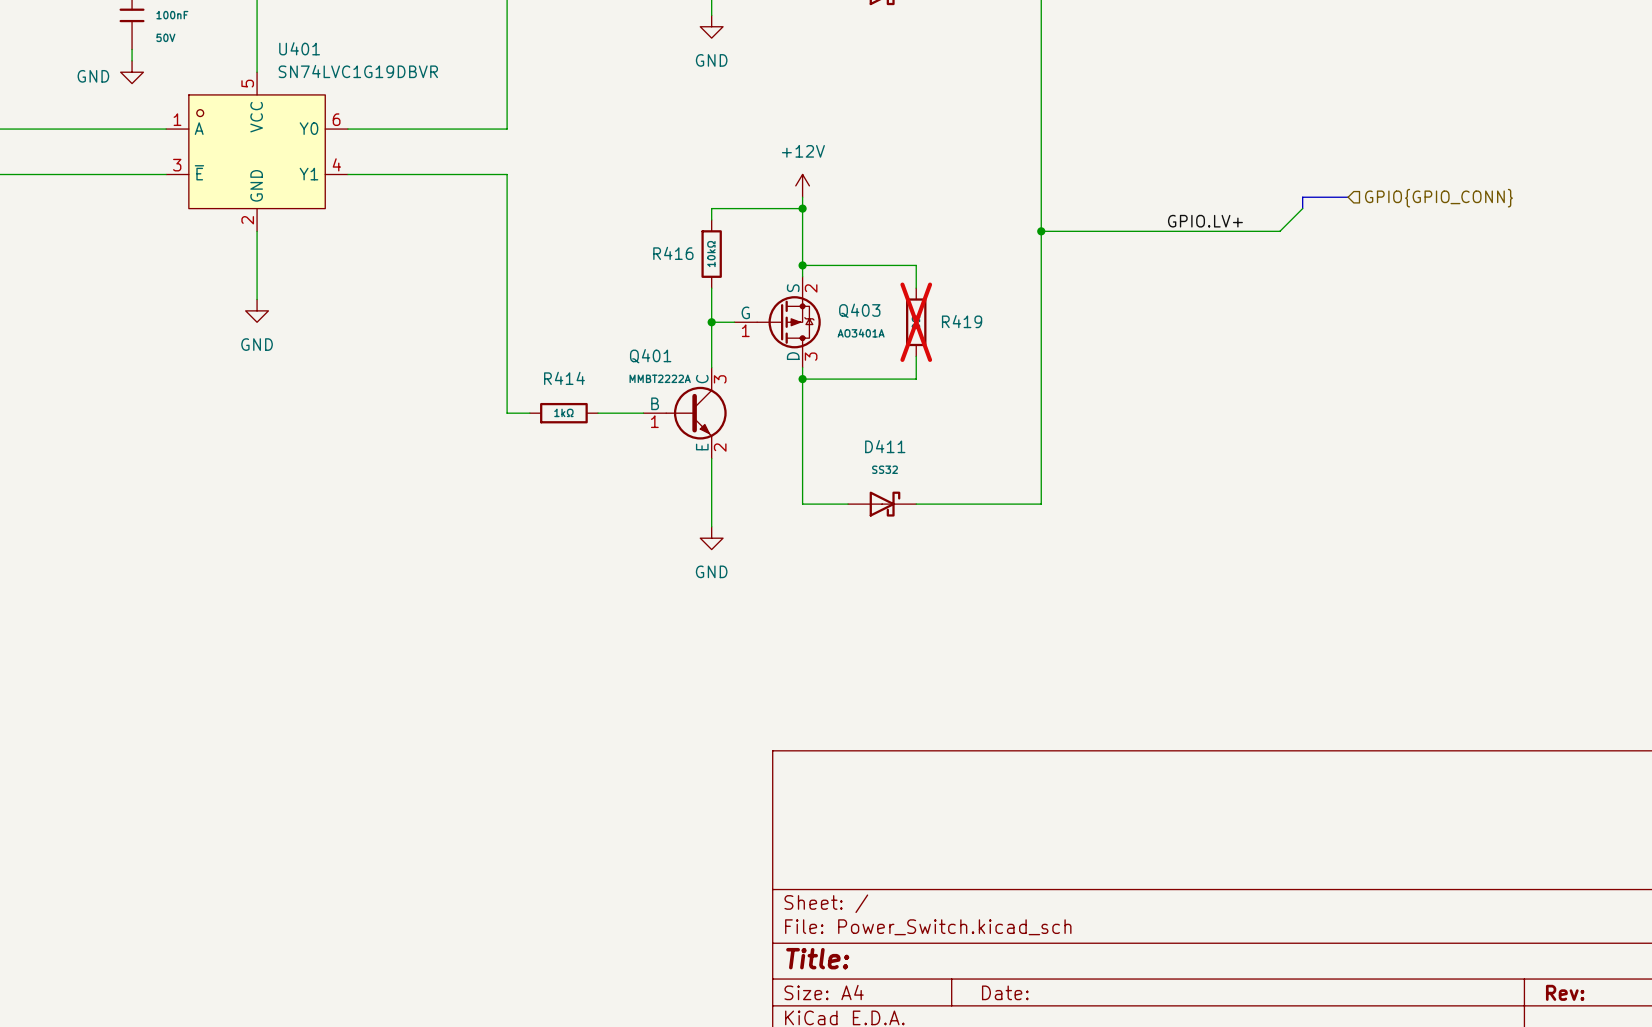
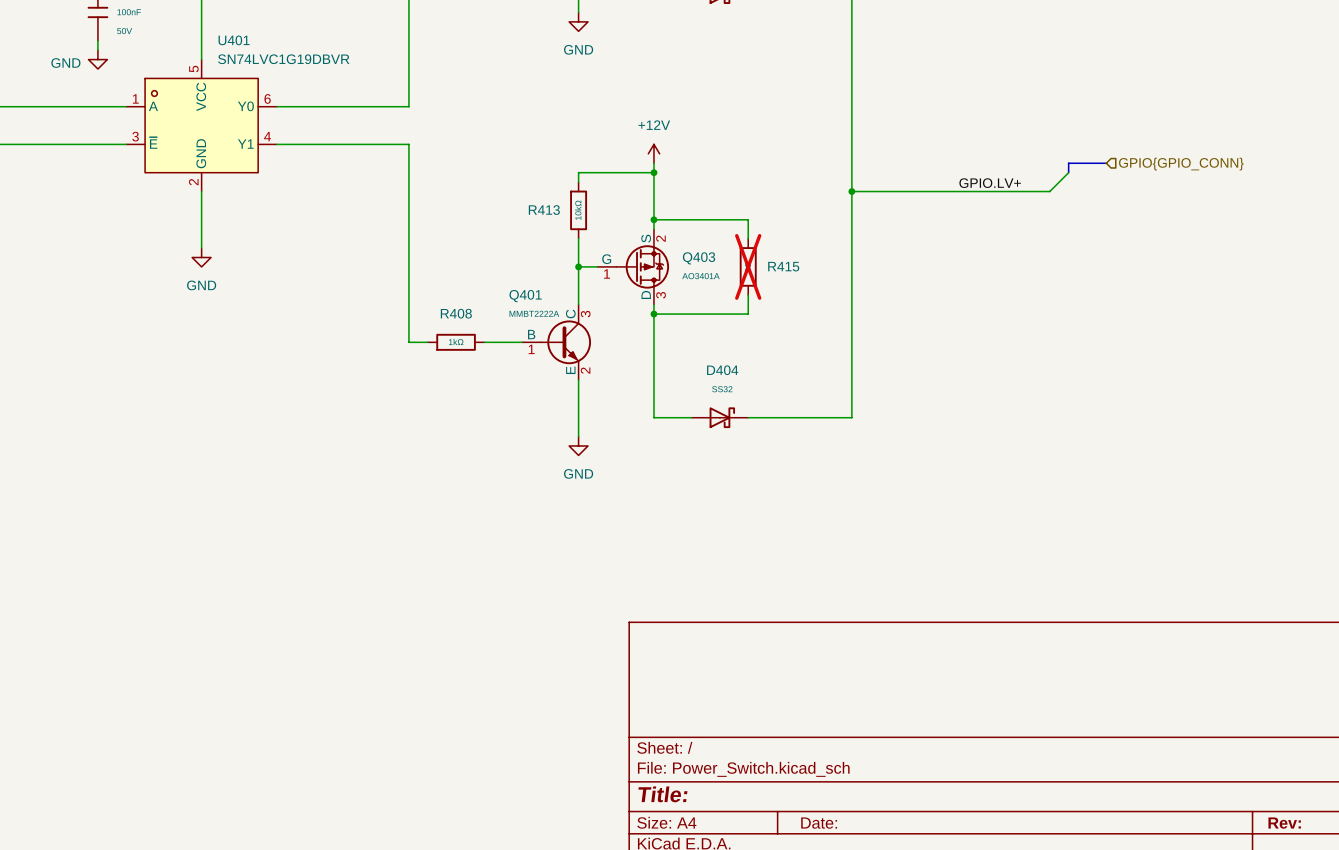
R416 name: R416 (673, 253) -> R413 (544, 210)
R419 name: R419 (962, 321) -> R415 (783, 266)
R414 name: R414 (564, 378) -> R408 (456, 313)
D411 name: D411 (885, 446) -> D404 (722, 370)

